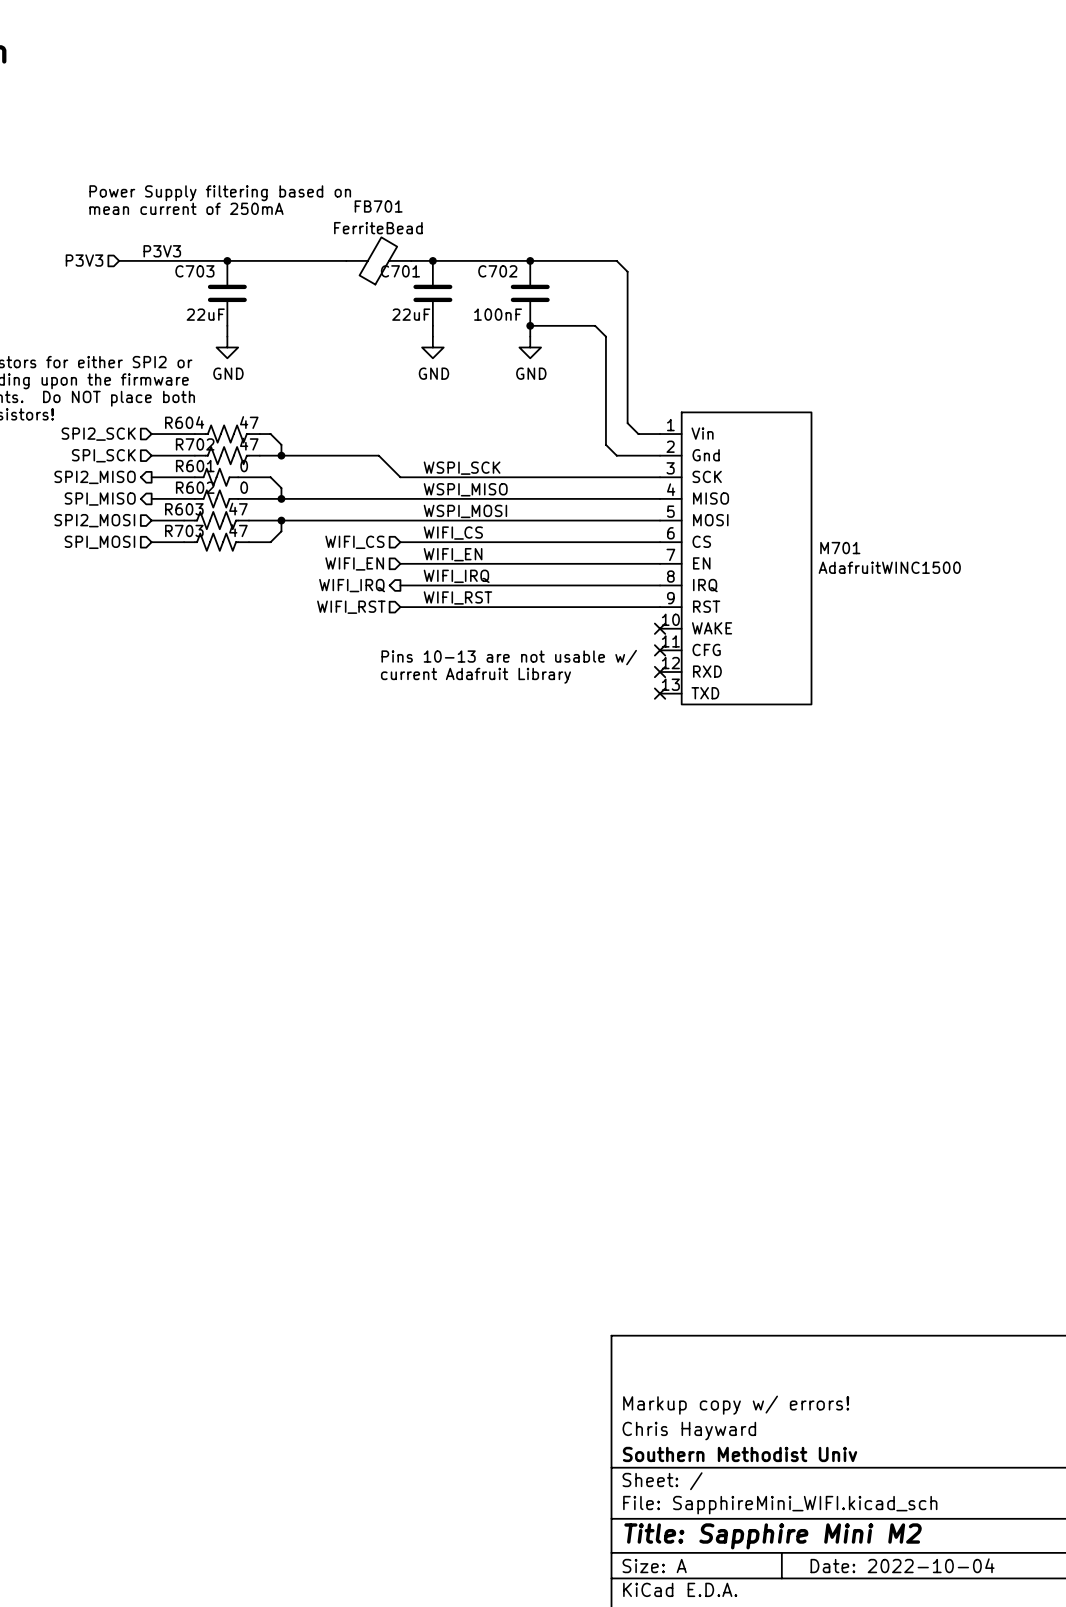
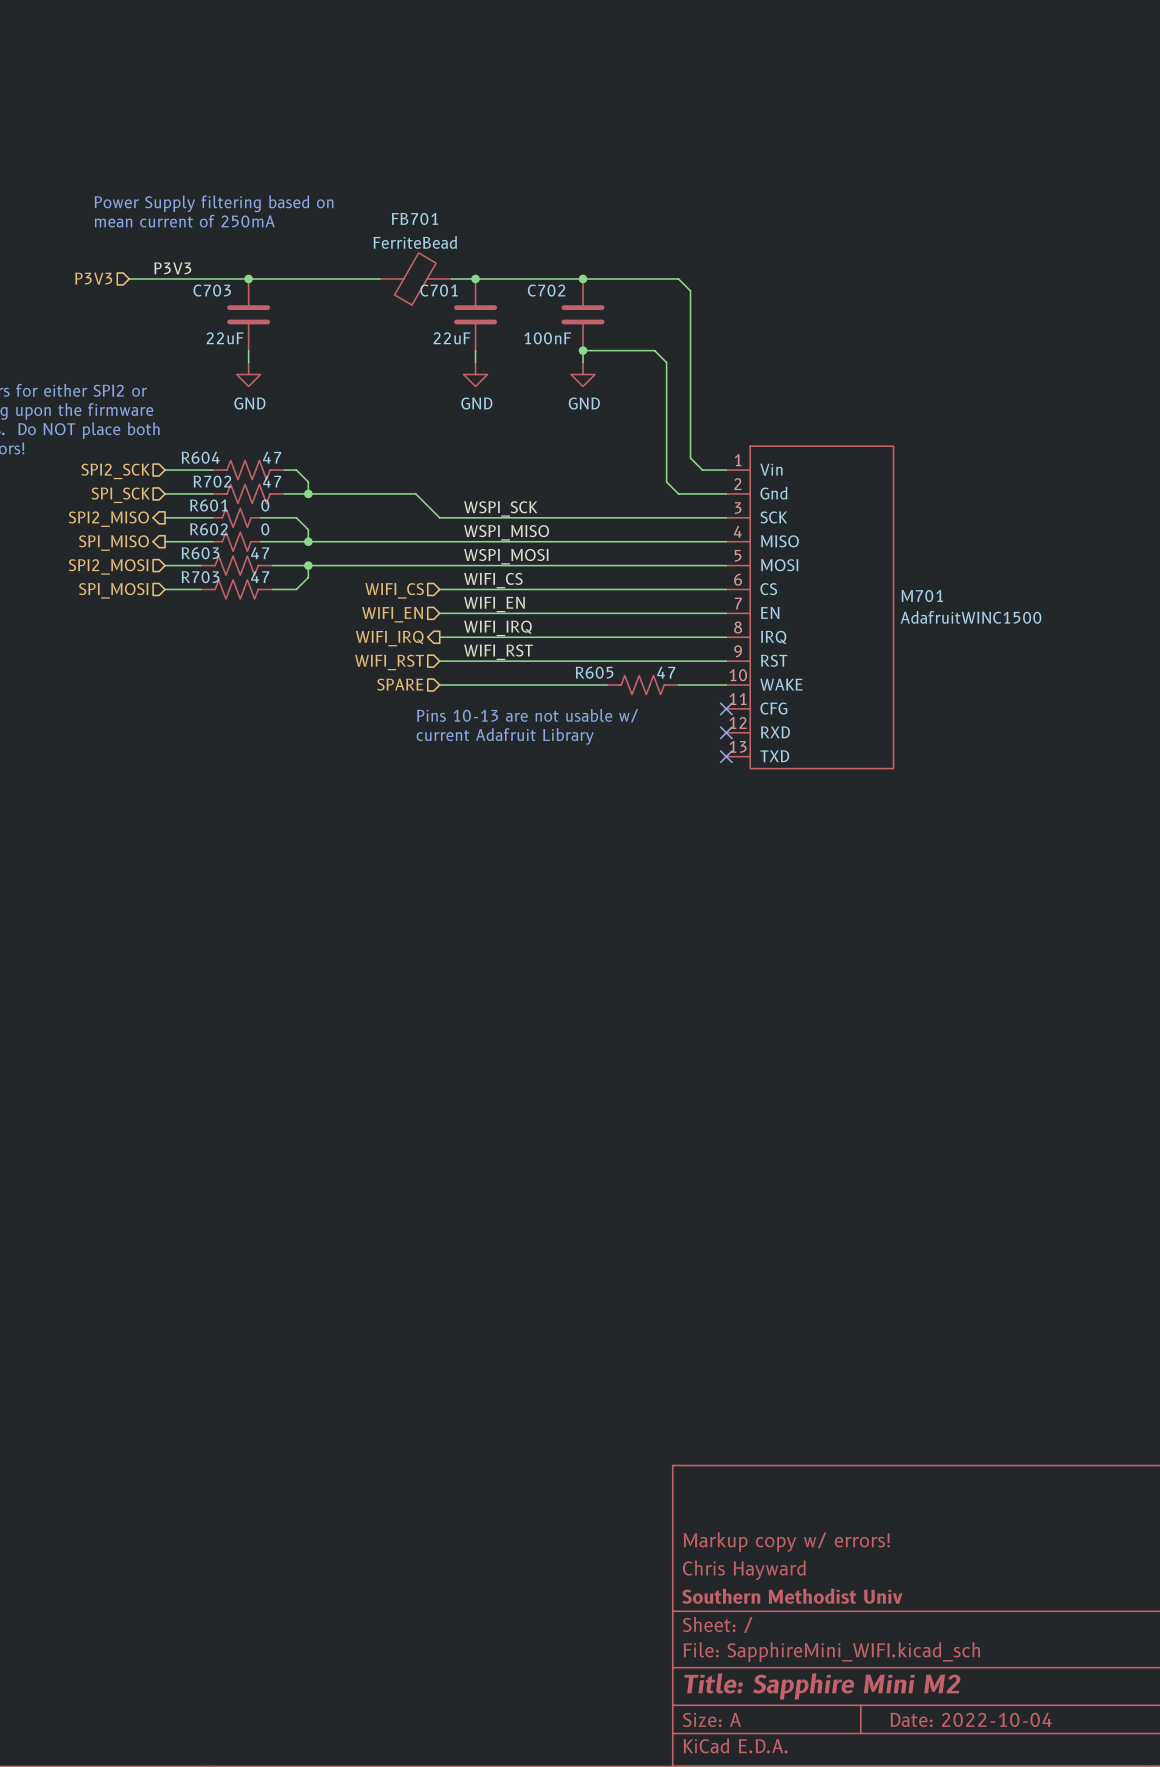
hierarchical label: none -> SPARE (400, 684)
wire: none -> (439, 685) (606, 685)
R605: none -> 47 (642, 685)
wire: none -> (678, 685) (726, 685)
no-connect mark: (660, 628) -> none

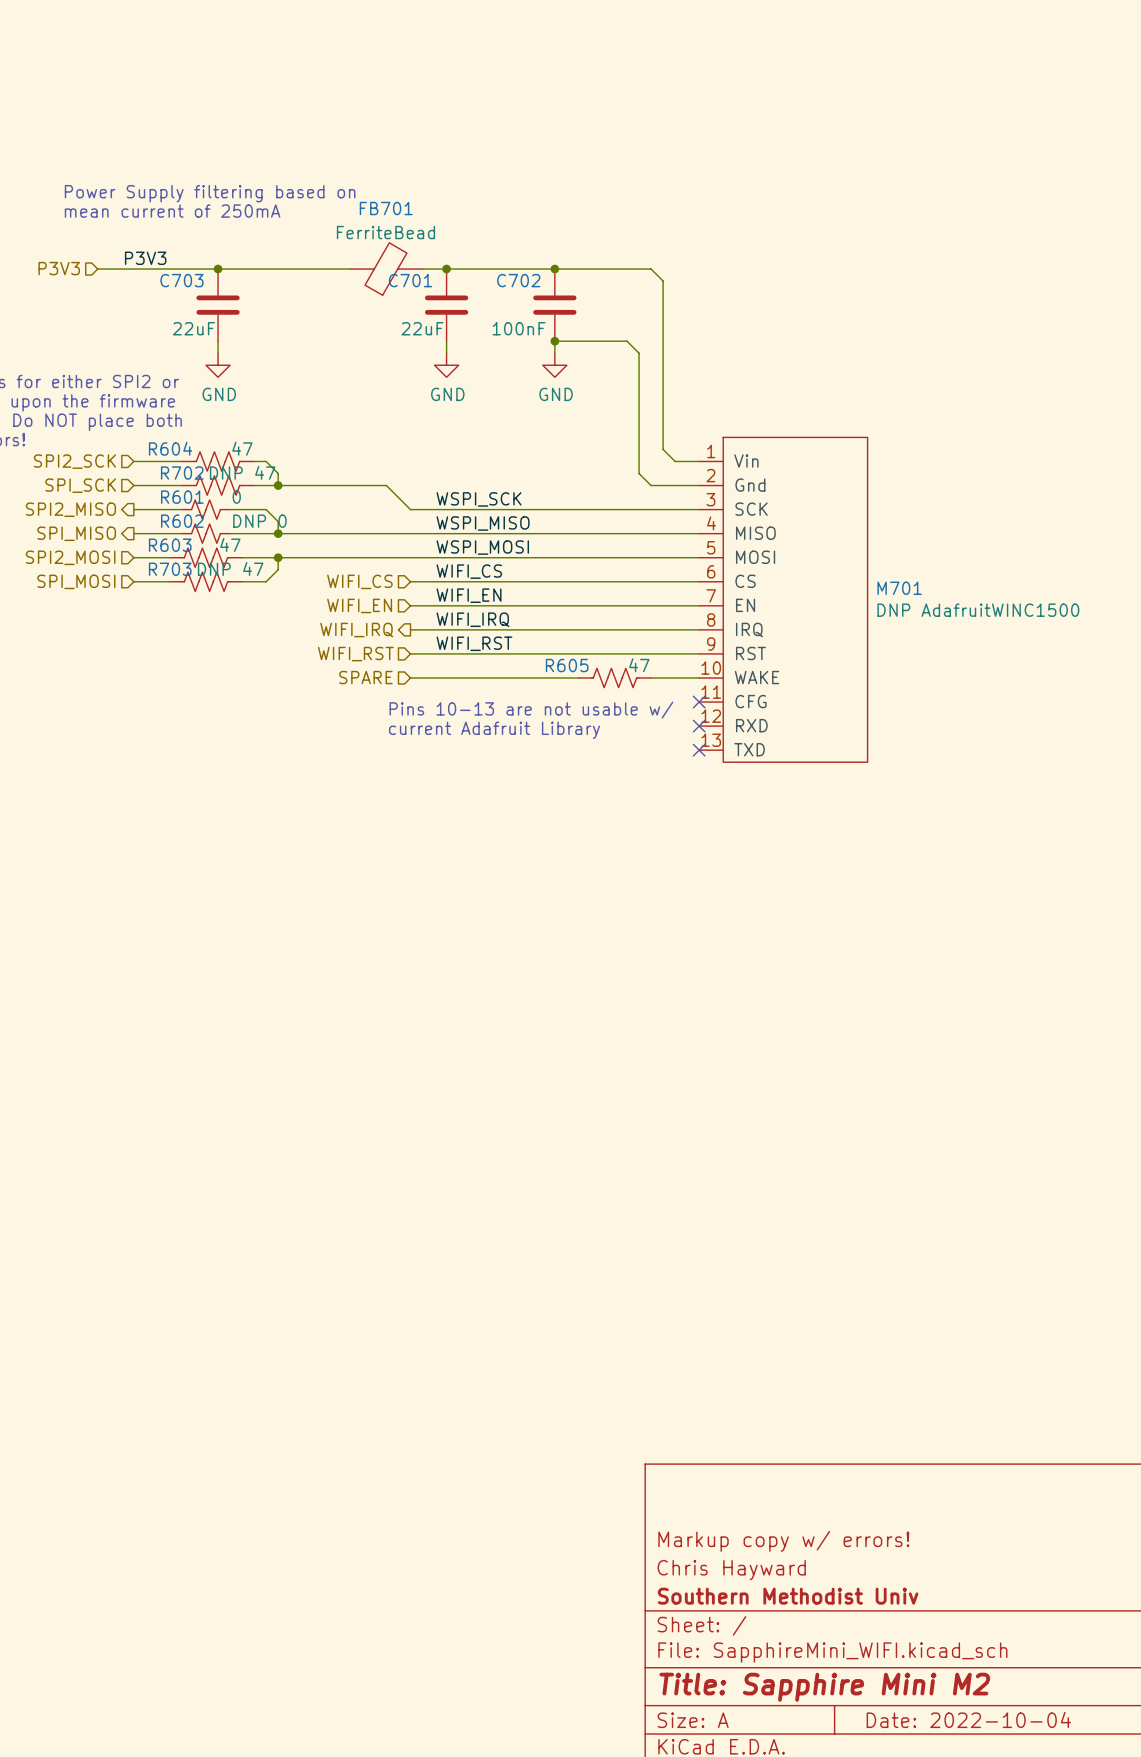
R702 value: 47 (272, 481) -> DNP 47 (242, 472)
R602 value: 0 (265, 529) -> DNP 0 (259, 521)
R703 value: 47 (260, 577) -> DNP 47 (230, 569)
M701 value: AdafruitWINC1500 (971, 617) -> DNP AdafruitWINC1500 (978, 610)

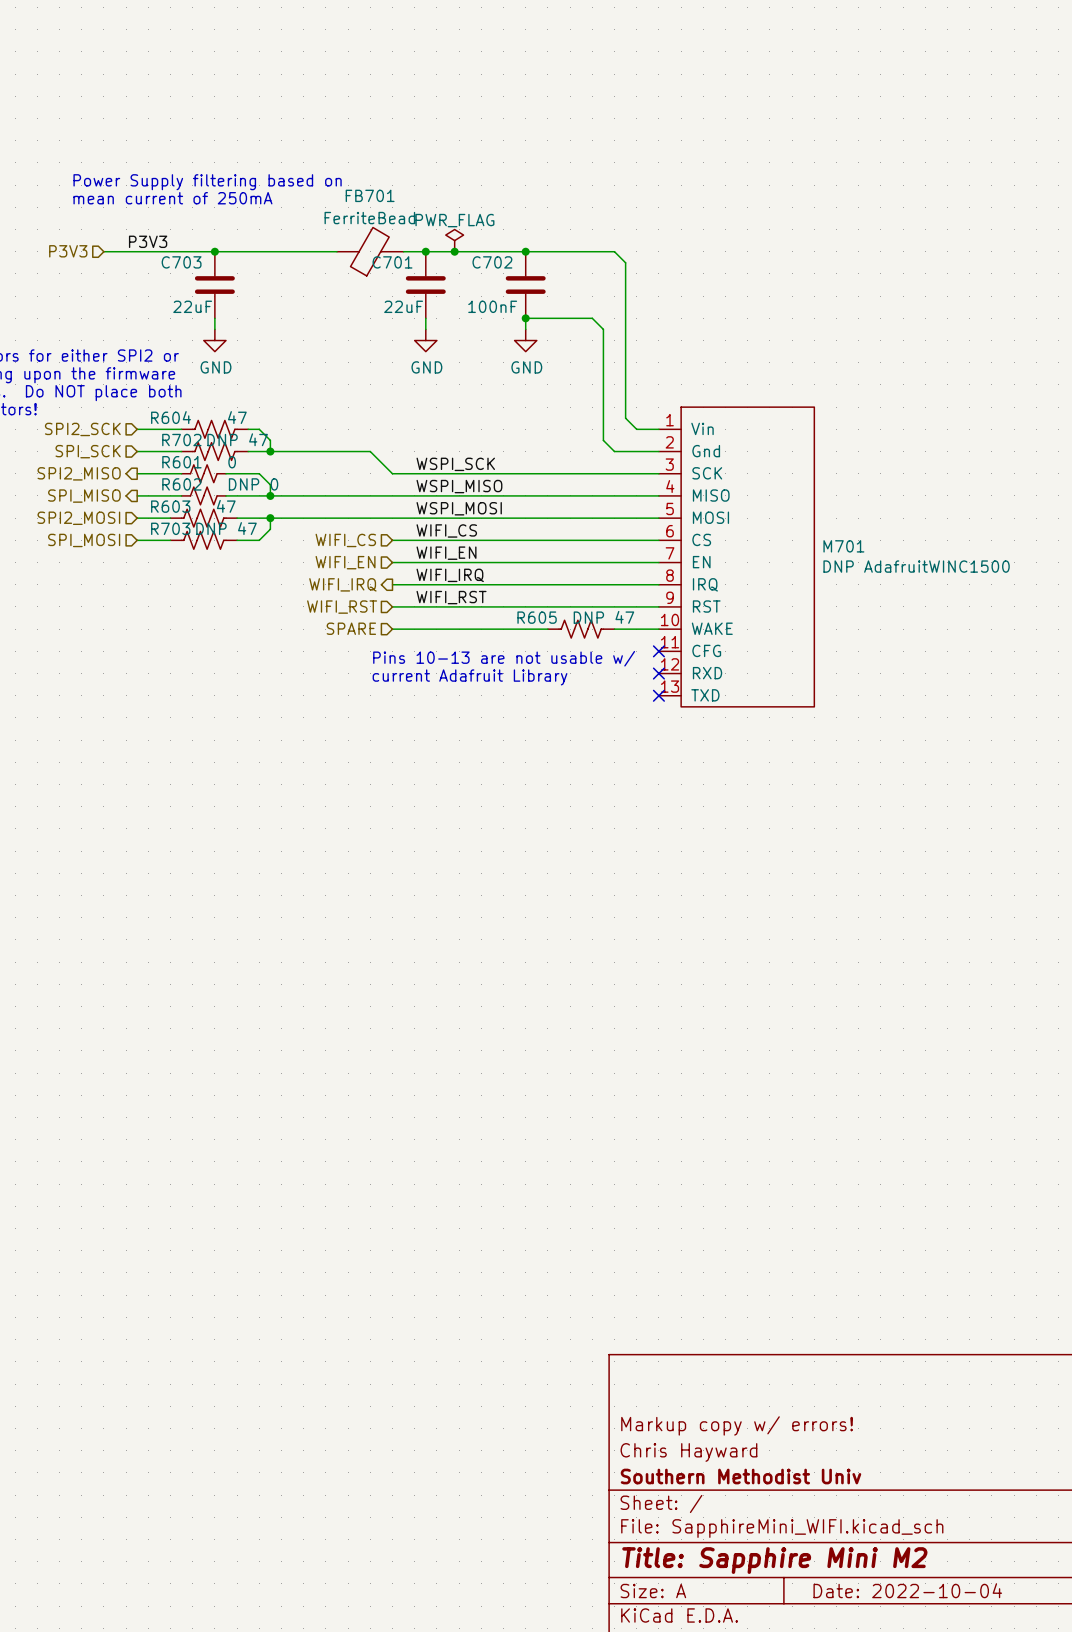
power symbol: none -> PWR_FLAG (454, 240)
junction: none -> (454, 251)
R605 value: 47 (639, 665) -> DNP 47 (603, 617)

